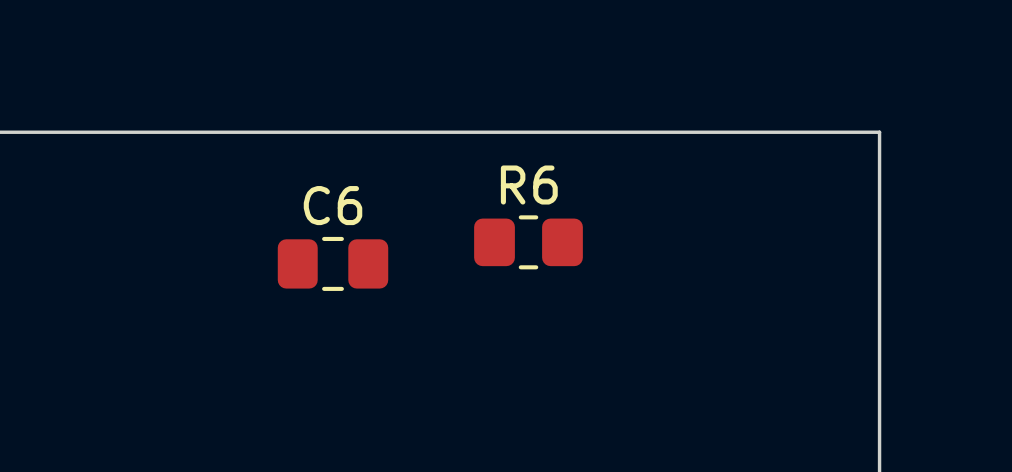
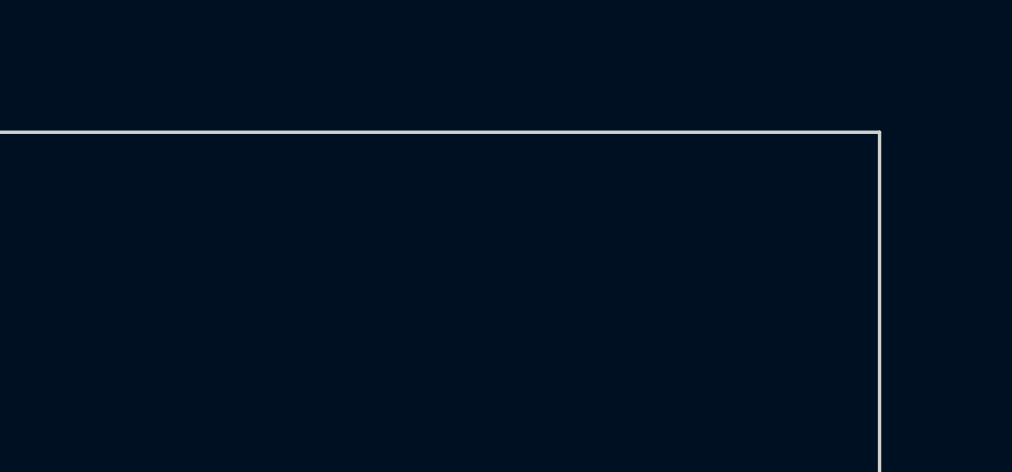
R6: (528, 242) -> none
C6: (333, 263) -> none

